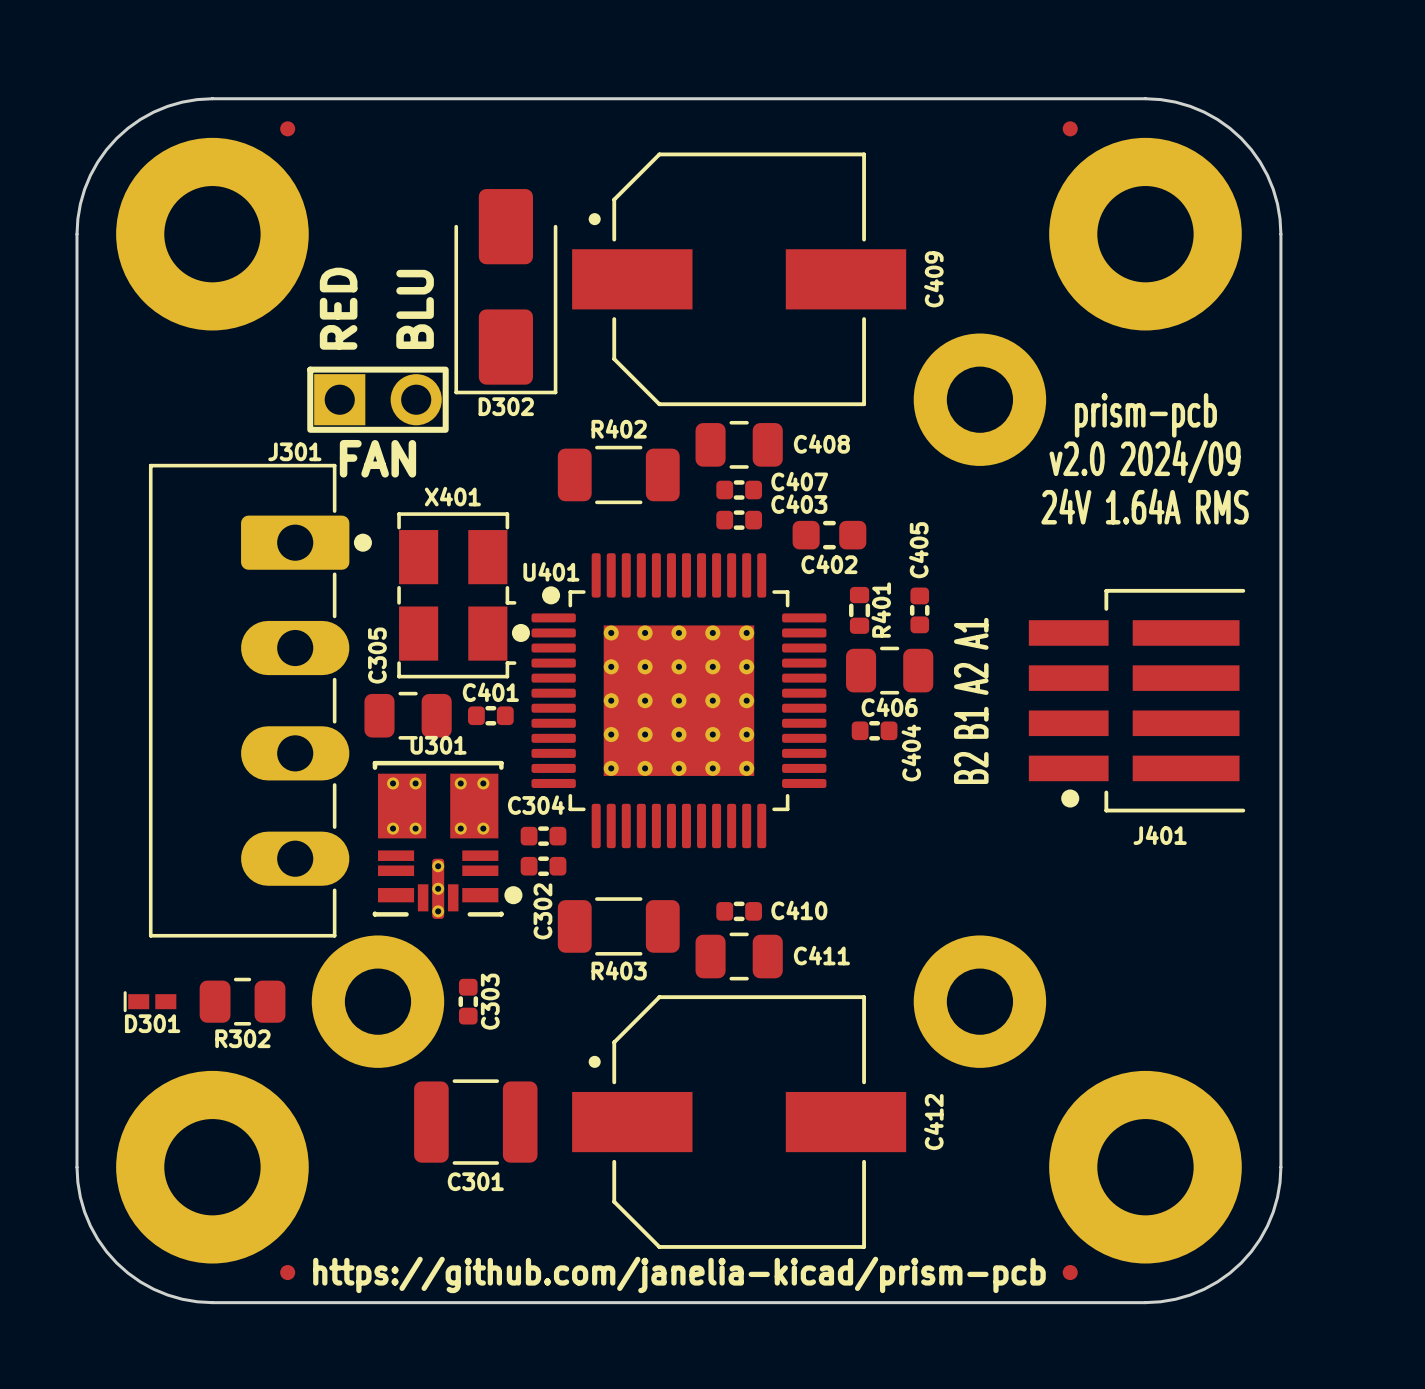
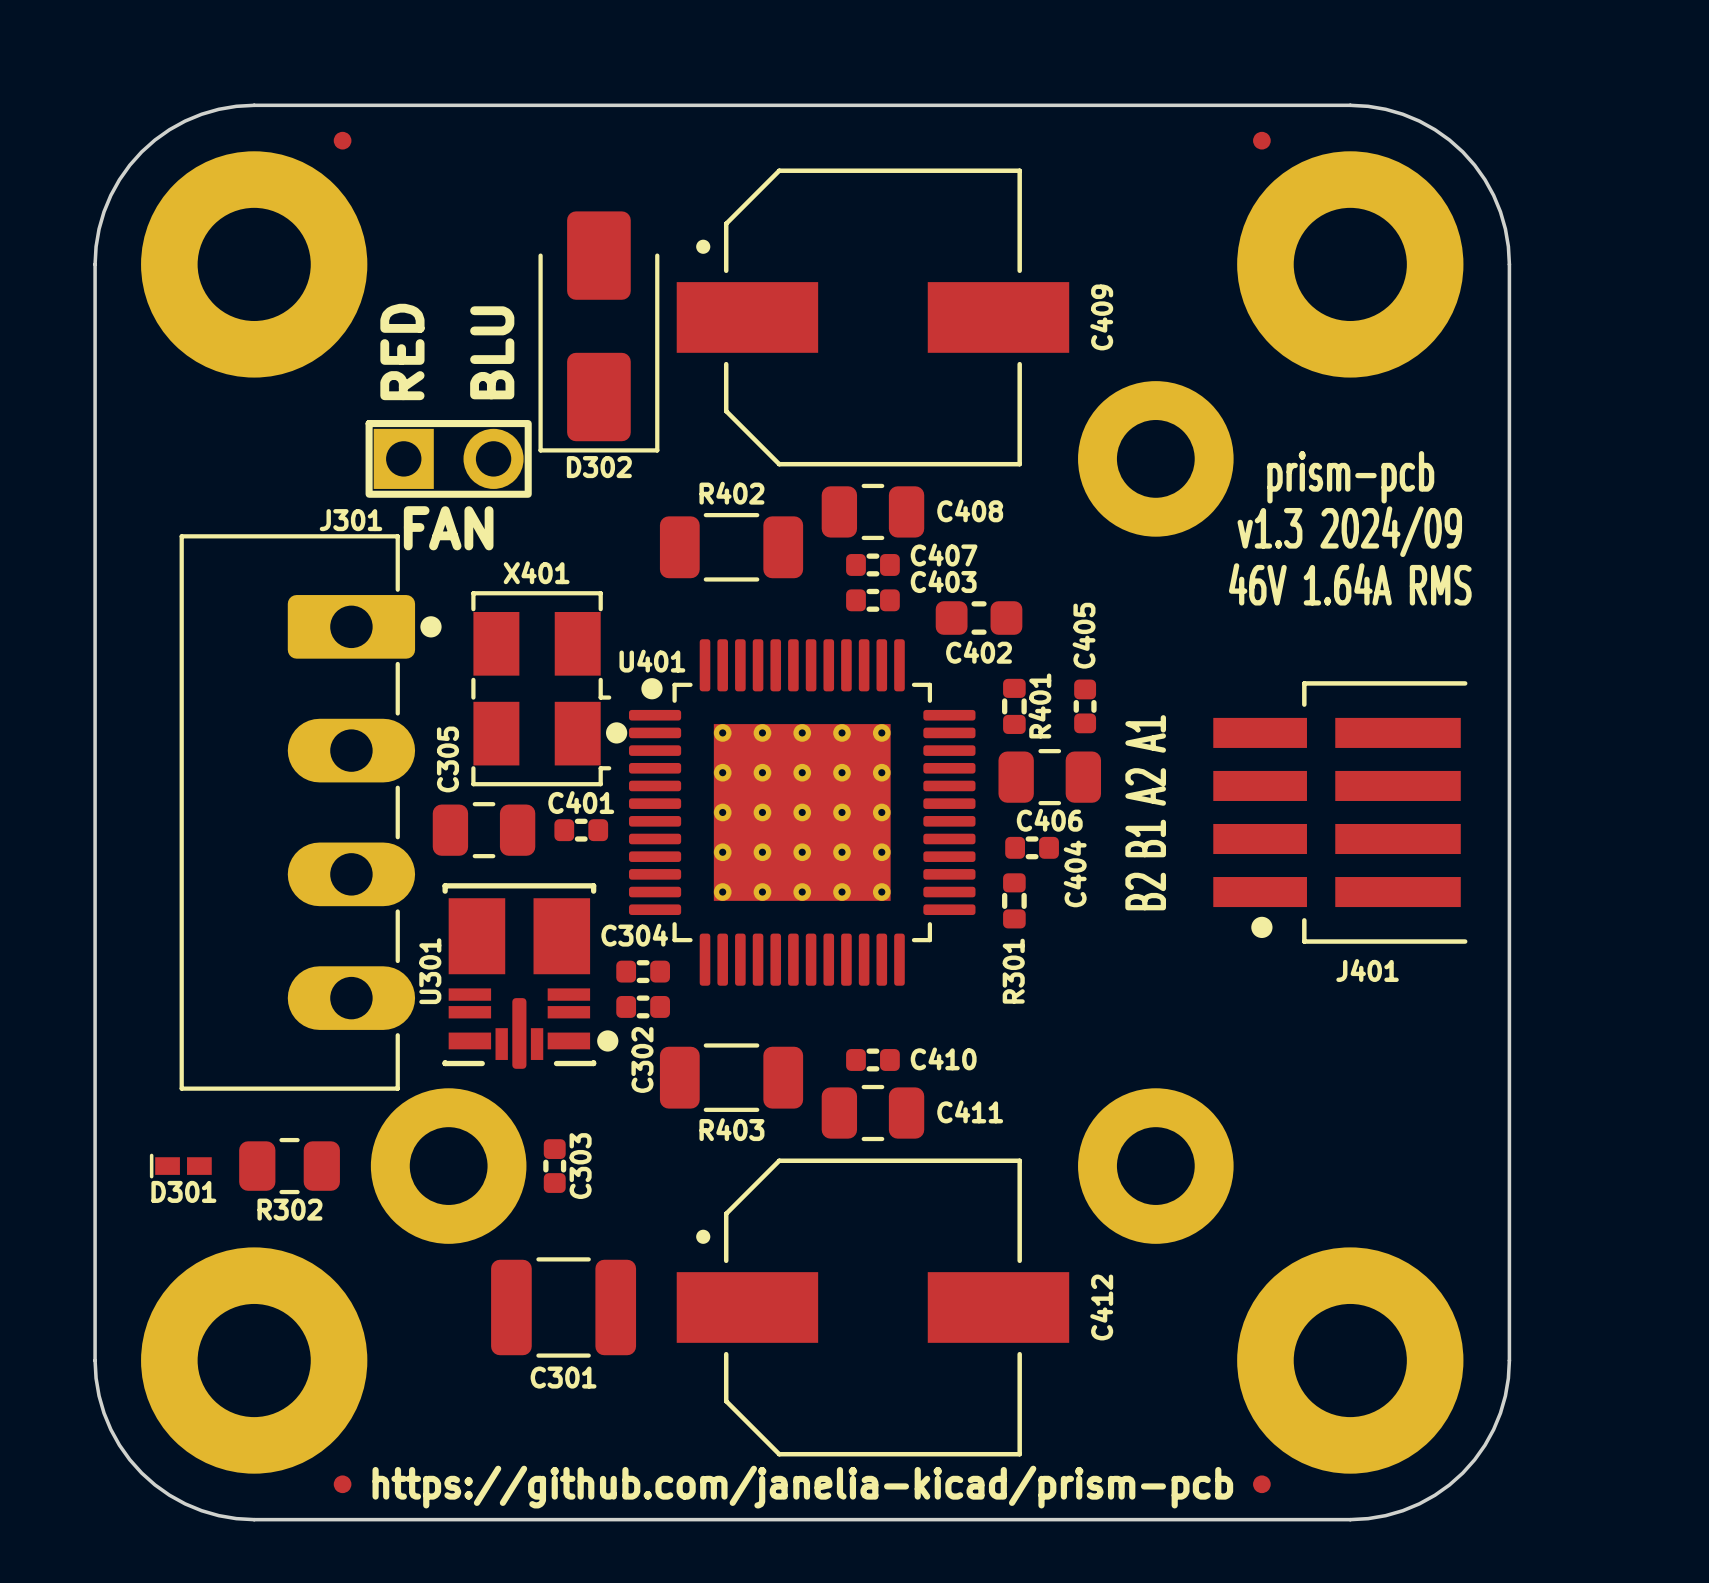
text: v2.0 2024/09 (1145, 461) -> v1.3 2024/09 (1349, 531)
text: 24V 1.64A RMS (1145, 506) -> 46V 1.64A RMS (1350, 584)
U301 name position: U301 (438, 745) -> U301 (430, 971)
U301 footprint: [372, 760, 523, 919] -> [442, 883, 619, 1069]
R301: none -> (1014, 900)

